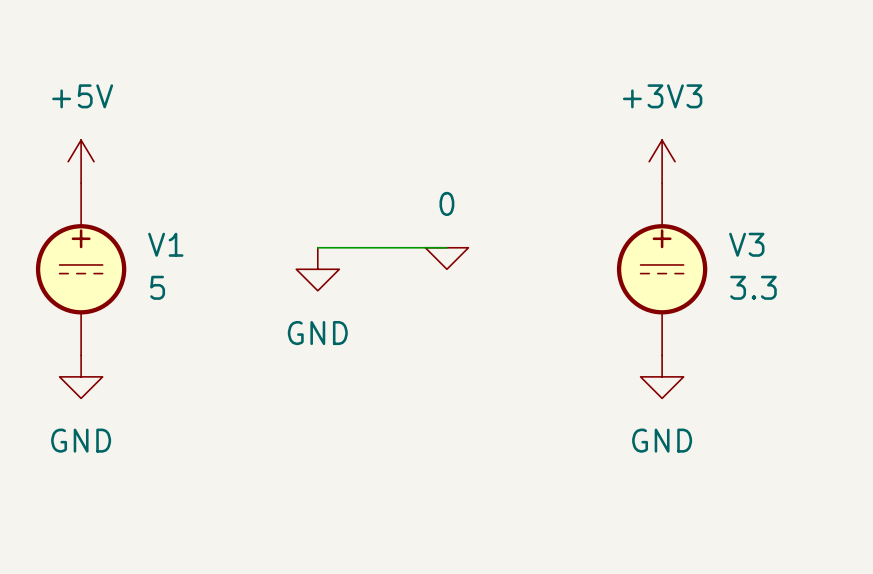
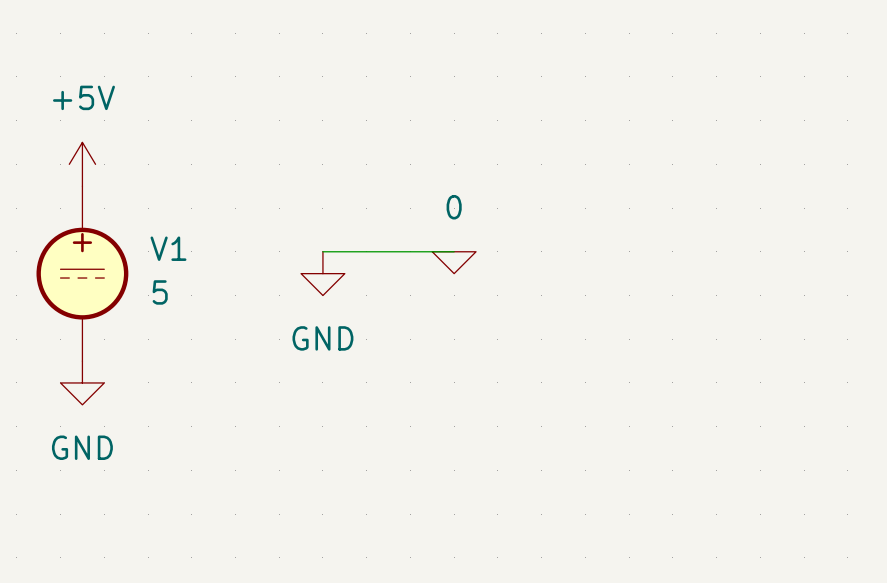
power symbol: +3V3 (662, 161) -> none
V3: 3.3 (662, 269) -> none
power symbol: GND (662, 376) -> none

